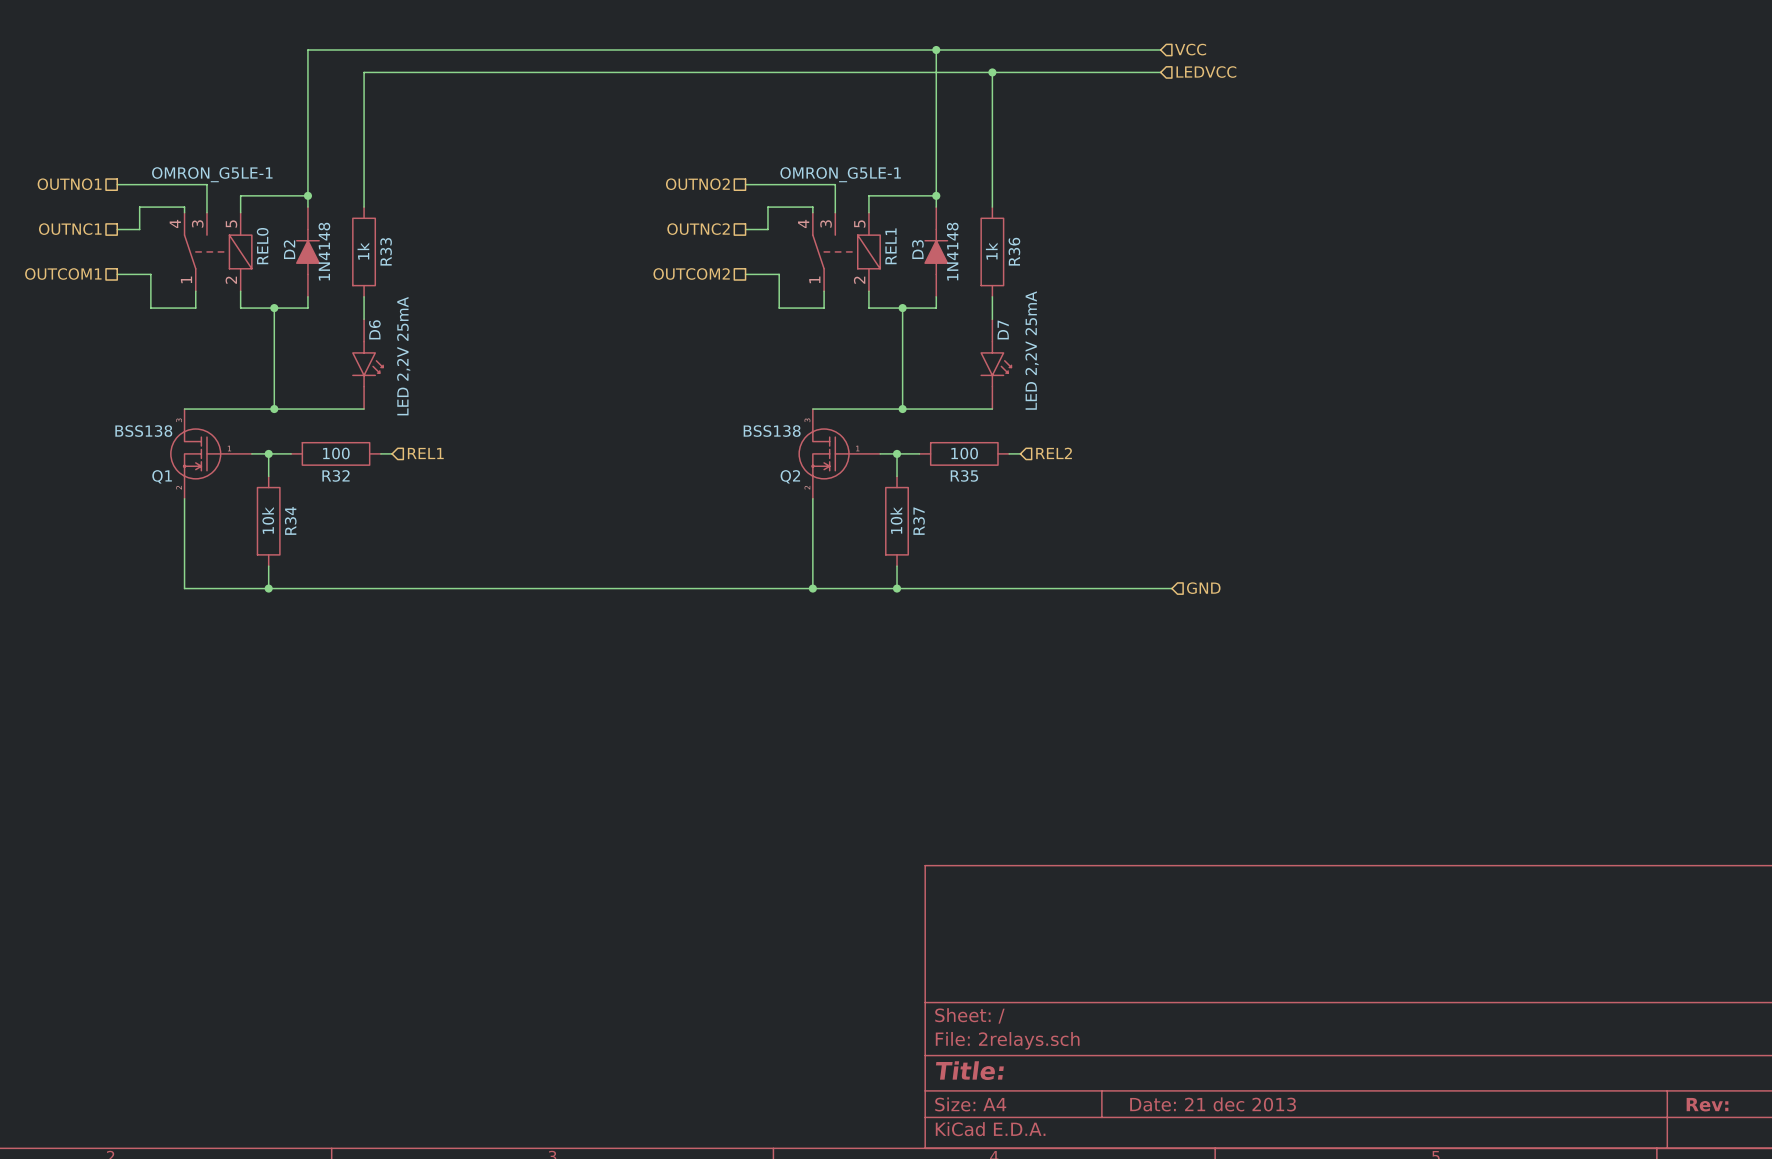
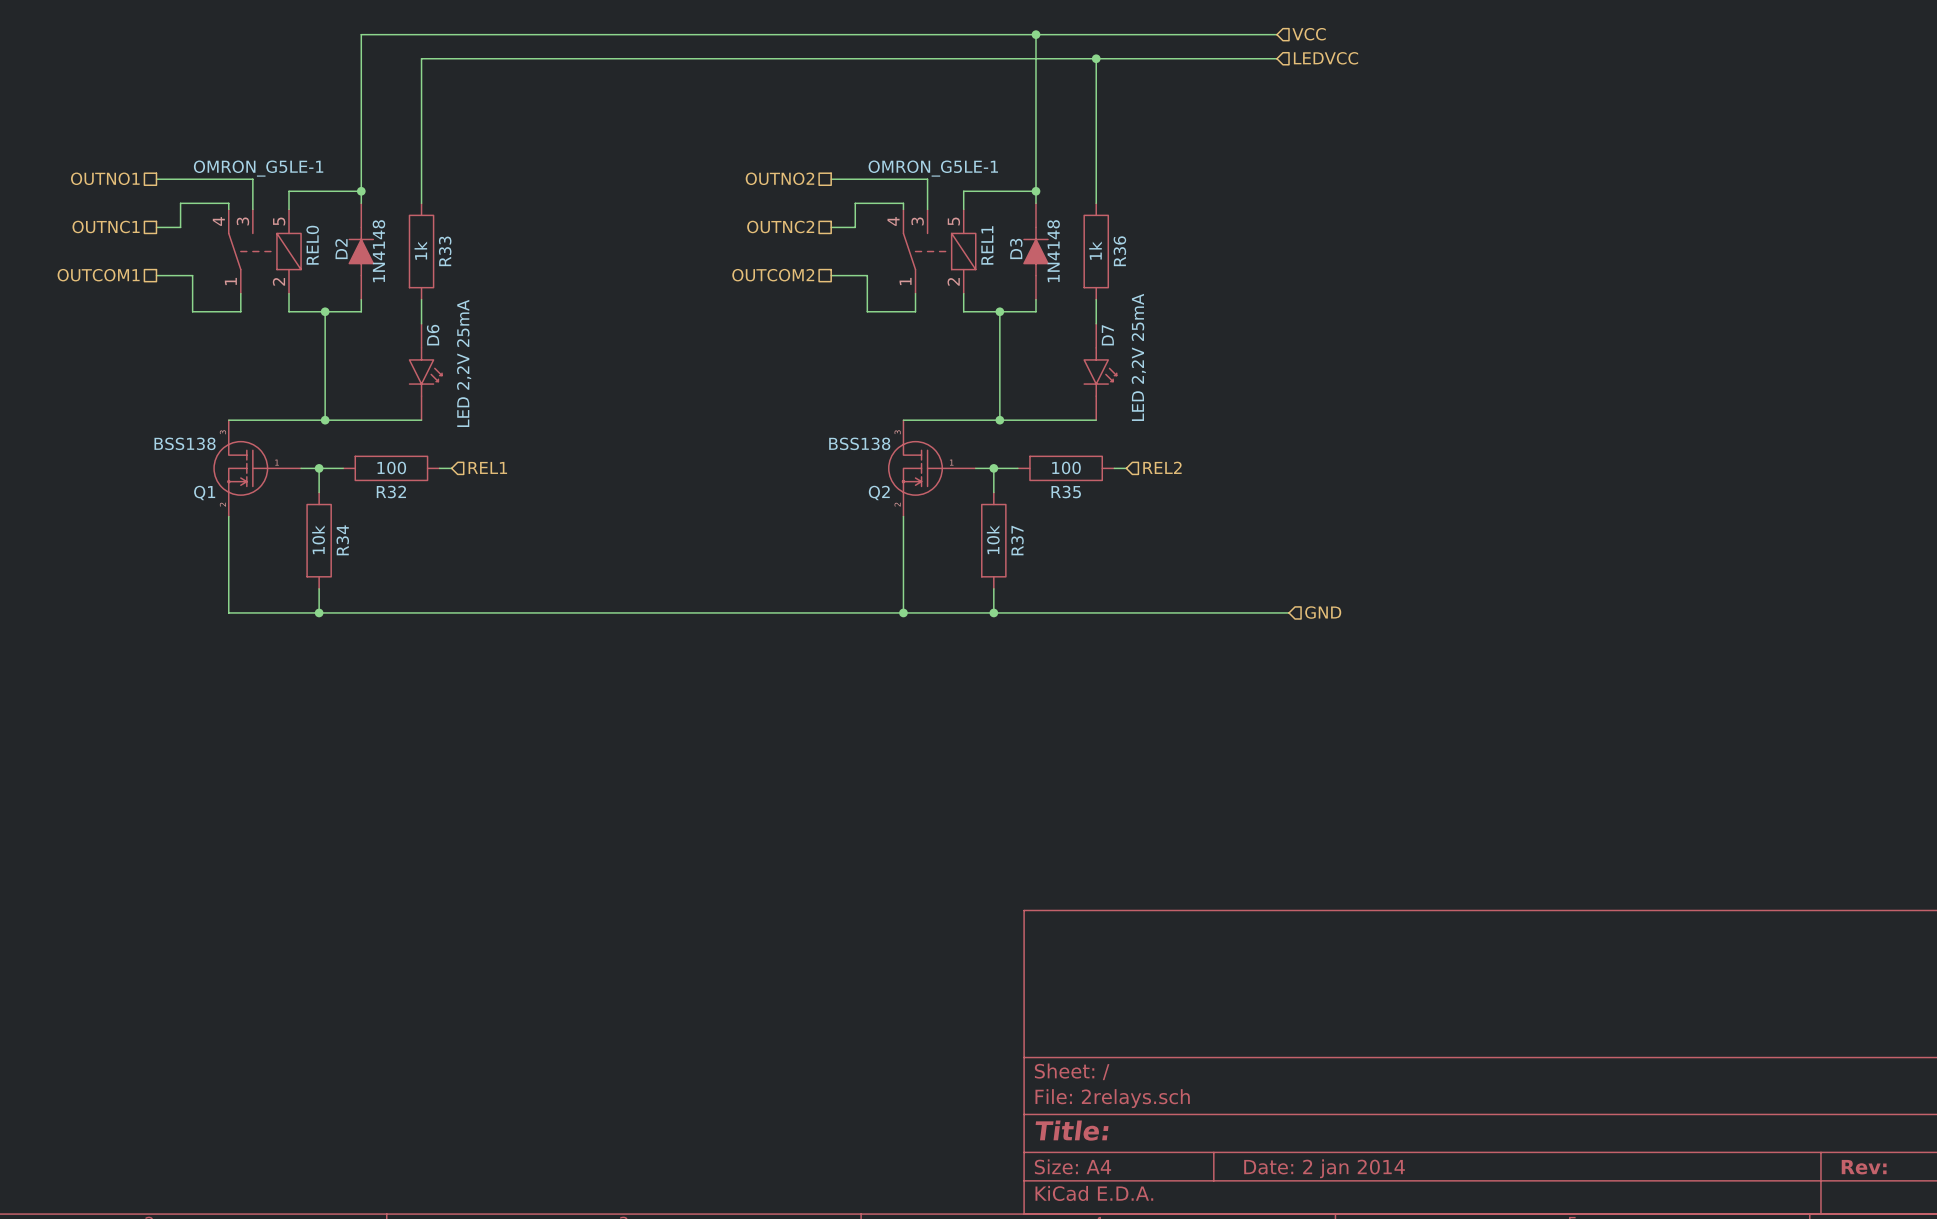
title block: Date: 21 dec 2013 (1213, 1104) -> Date: 2 jan 2014 (1324, 1168)

